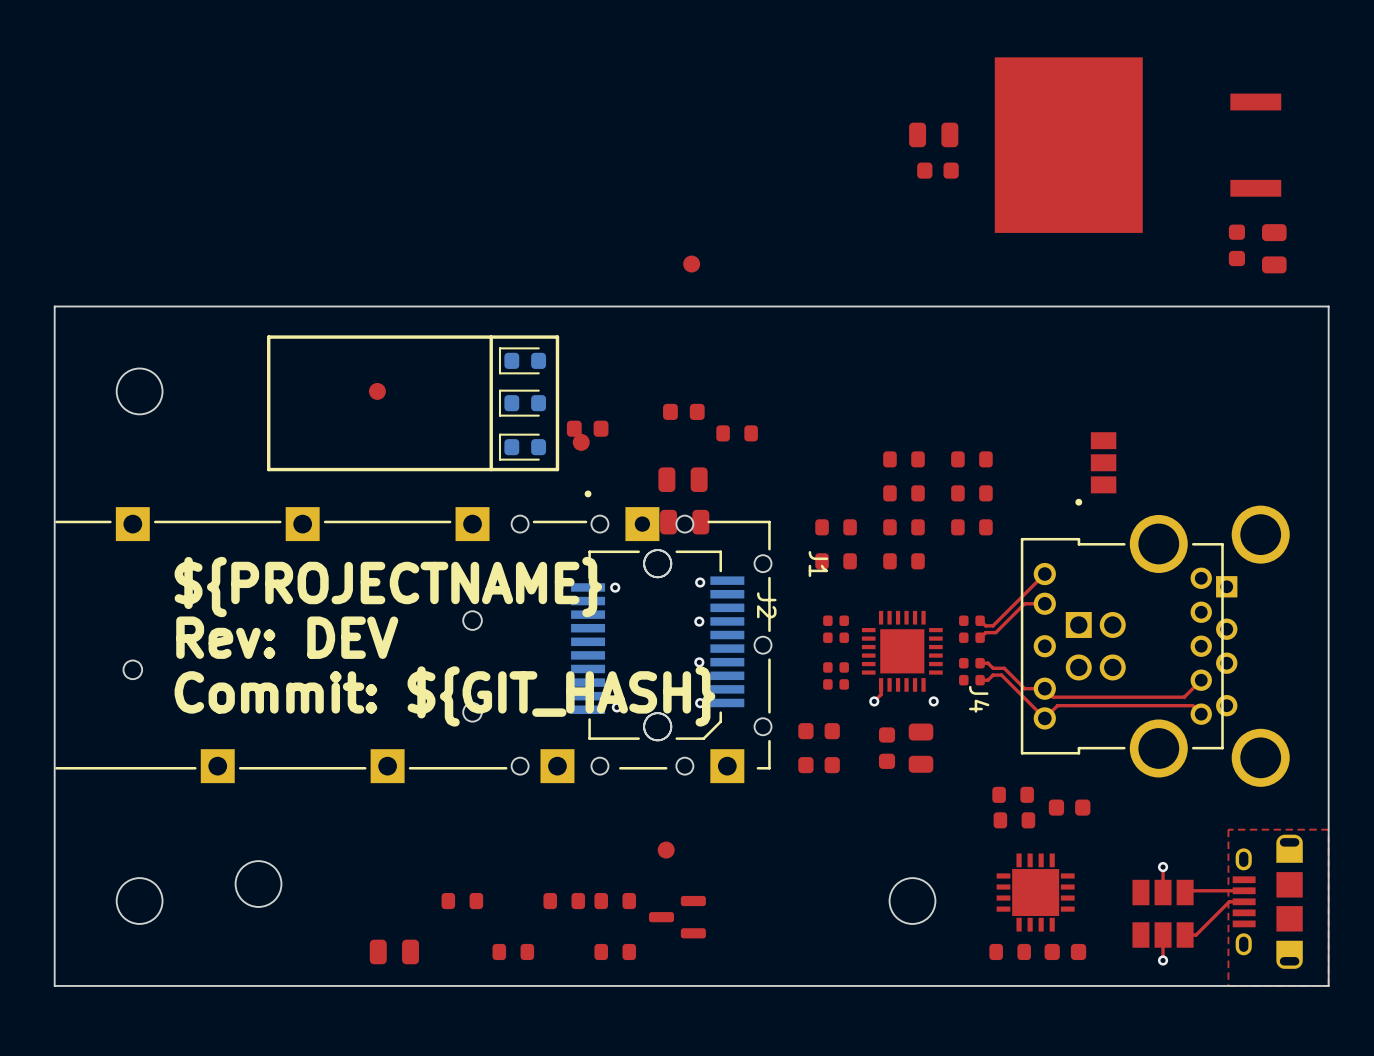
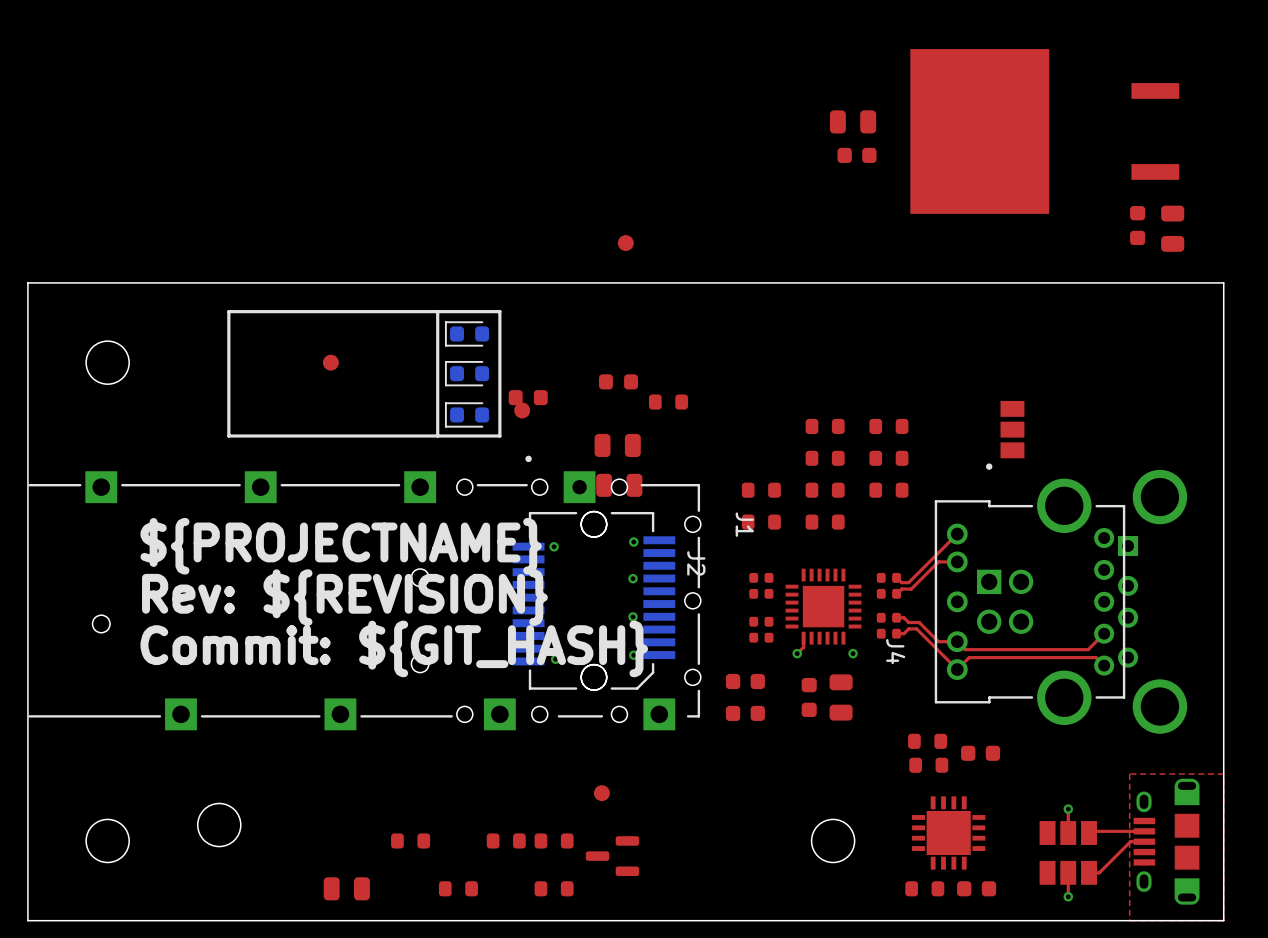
text: Rev: DEV (287, 637) -> Rev: ${REVISION} (344, 597)

